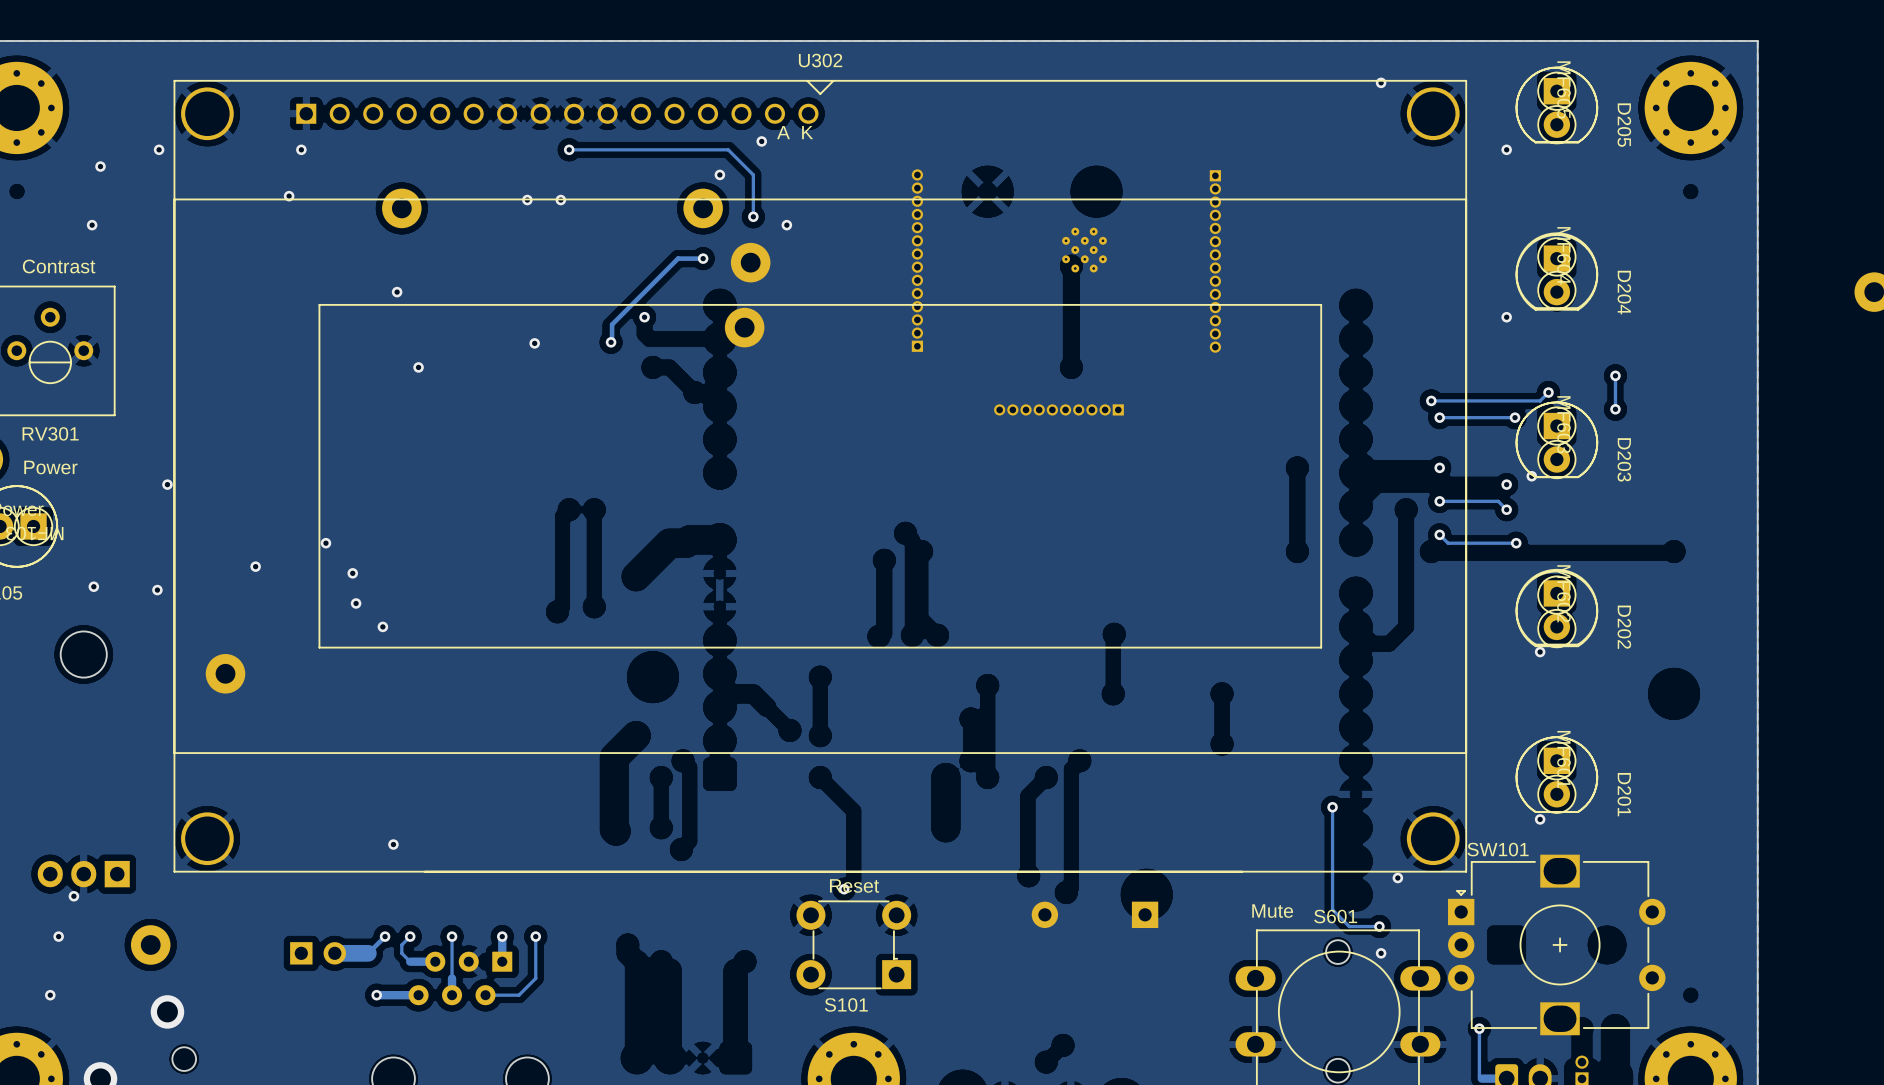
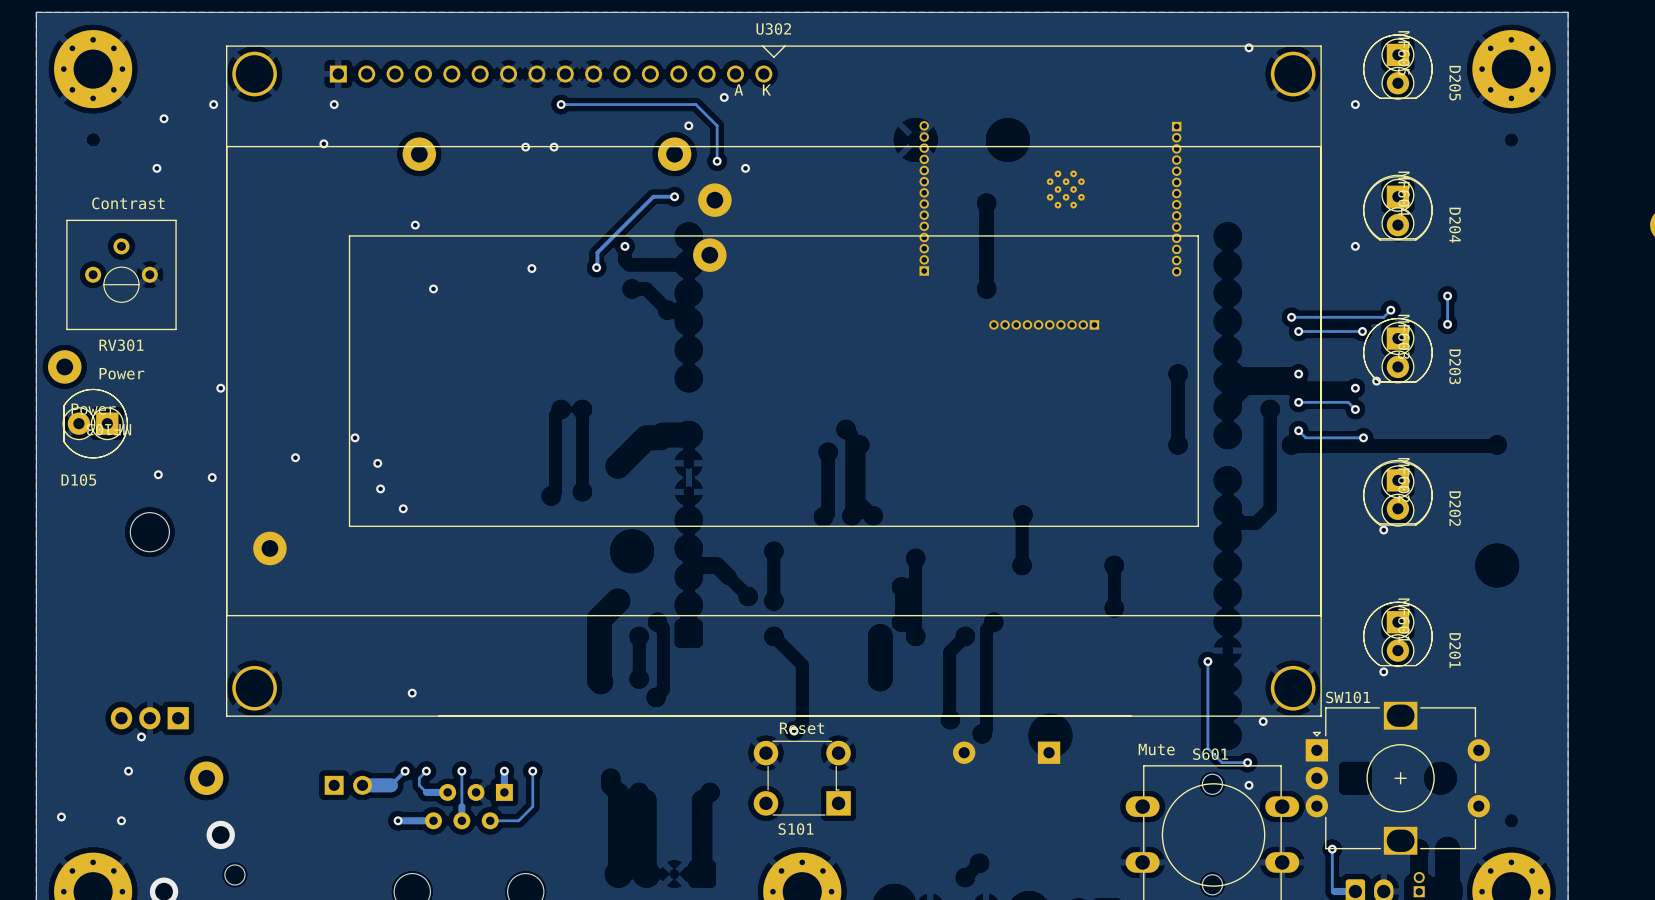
part position: (1084, 250) -> (1065, 189)
part position: (917, 260) -> (924, 198)
part position: (1215, 261) -> (1176, 199)
part position: (1058, 409) -> (1044, 324)

